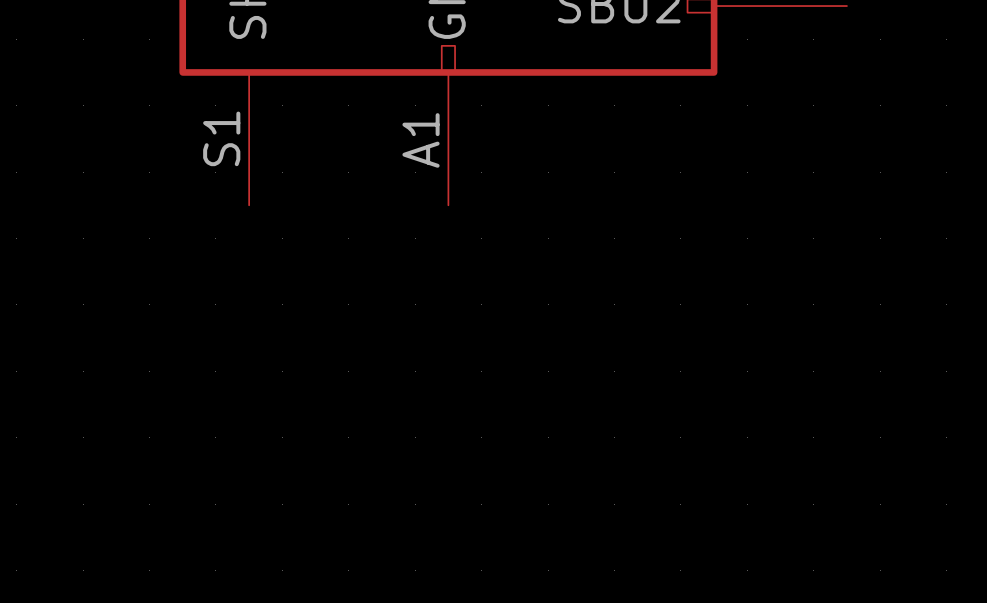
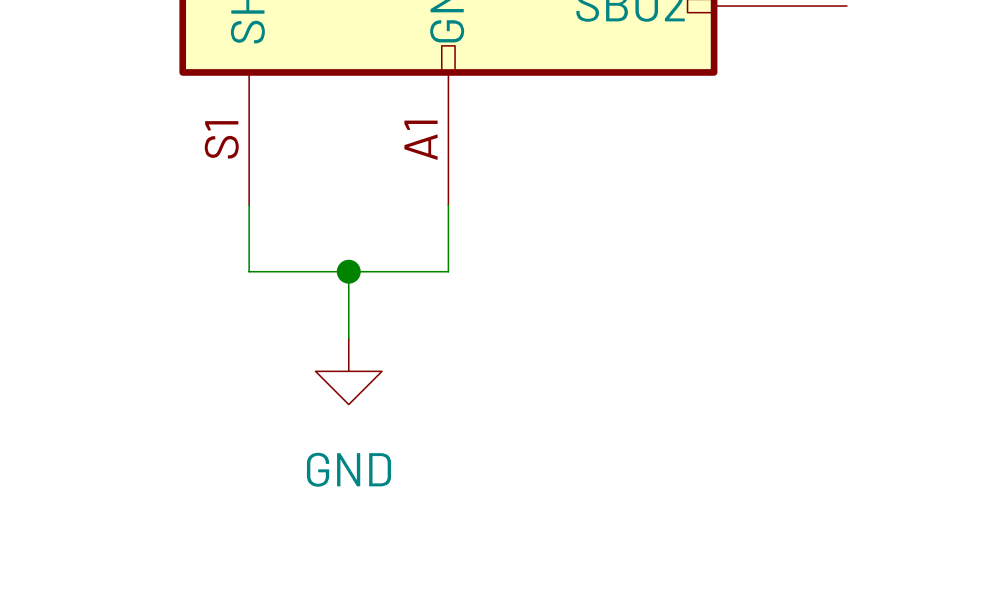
wire: none -> (249, 205) (249, 271) (448, 271) (448, 205)
wire: none -> (348, 271) (348, 338)
junction: none -> (348, 271)
power symbol: none -> GND (348, 371)

